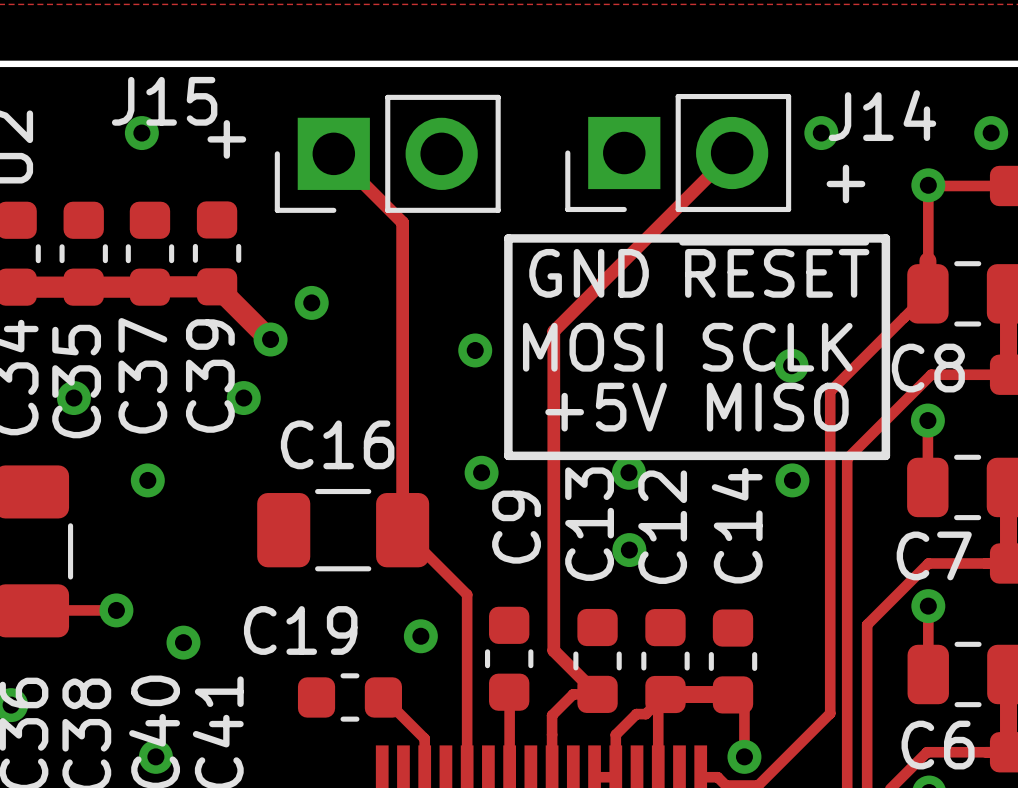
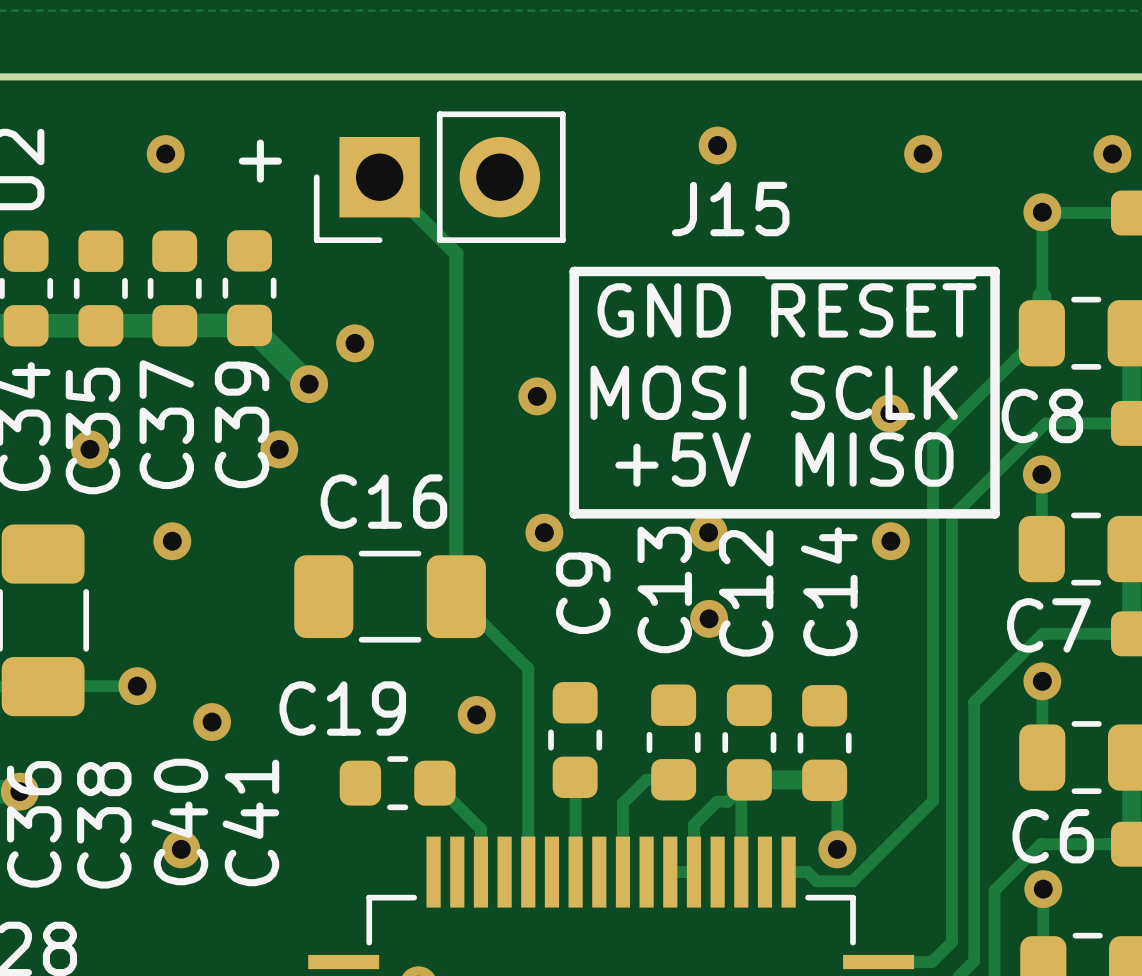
J15 name position: J15 (164, 101) -> J15 (730, 209)
via: none -> (717, 145)
J14: (678, 153) -> none
track: (732, 153) (553, 331) (553, 650) (597, 694) -> none
text: + (845, 184) -> none

